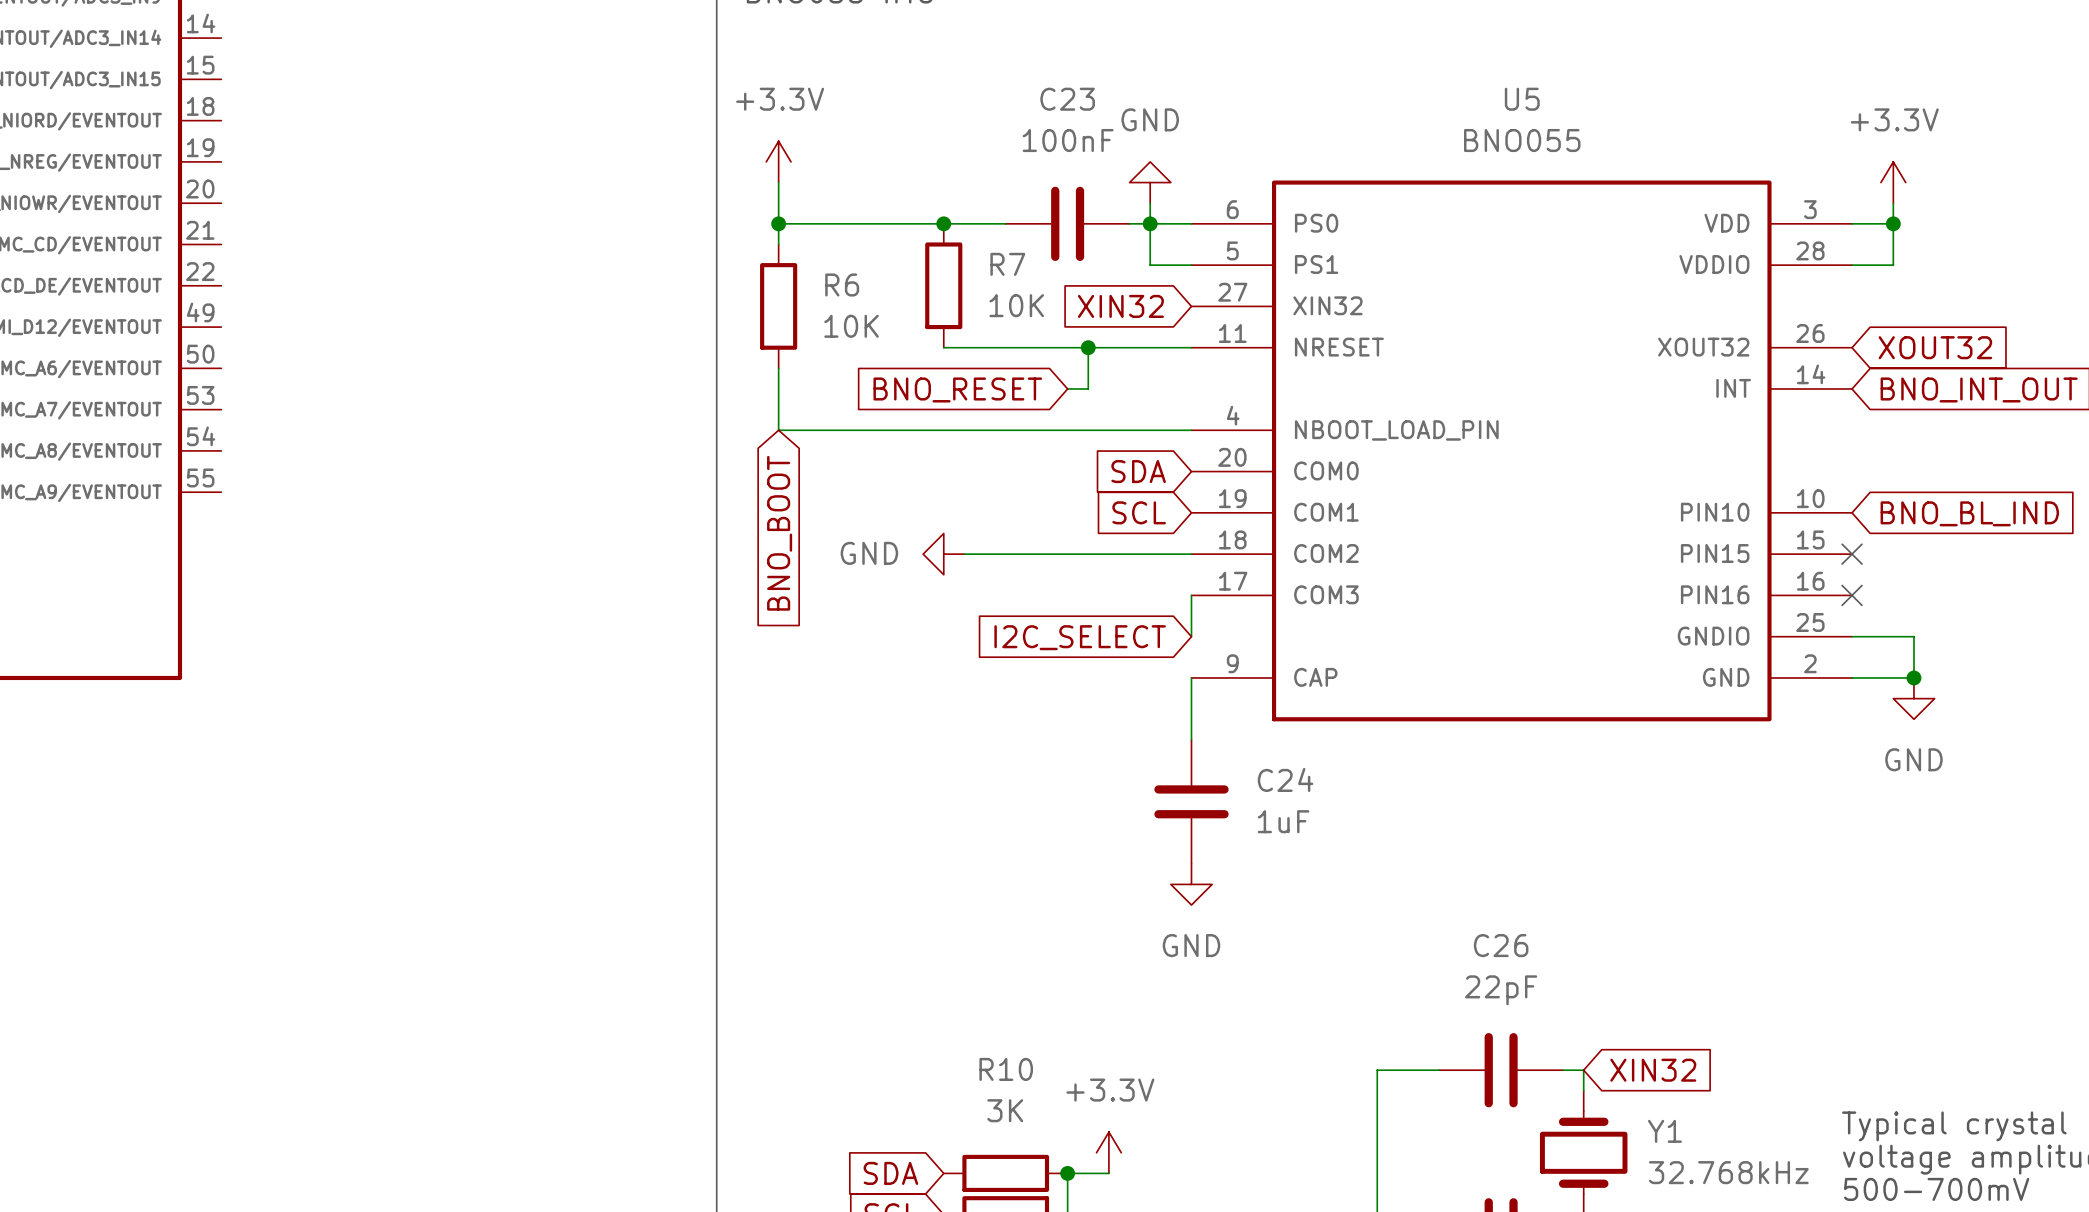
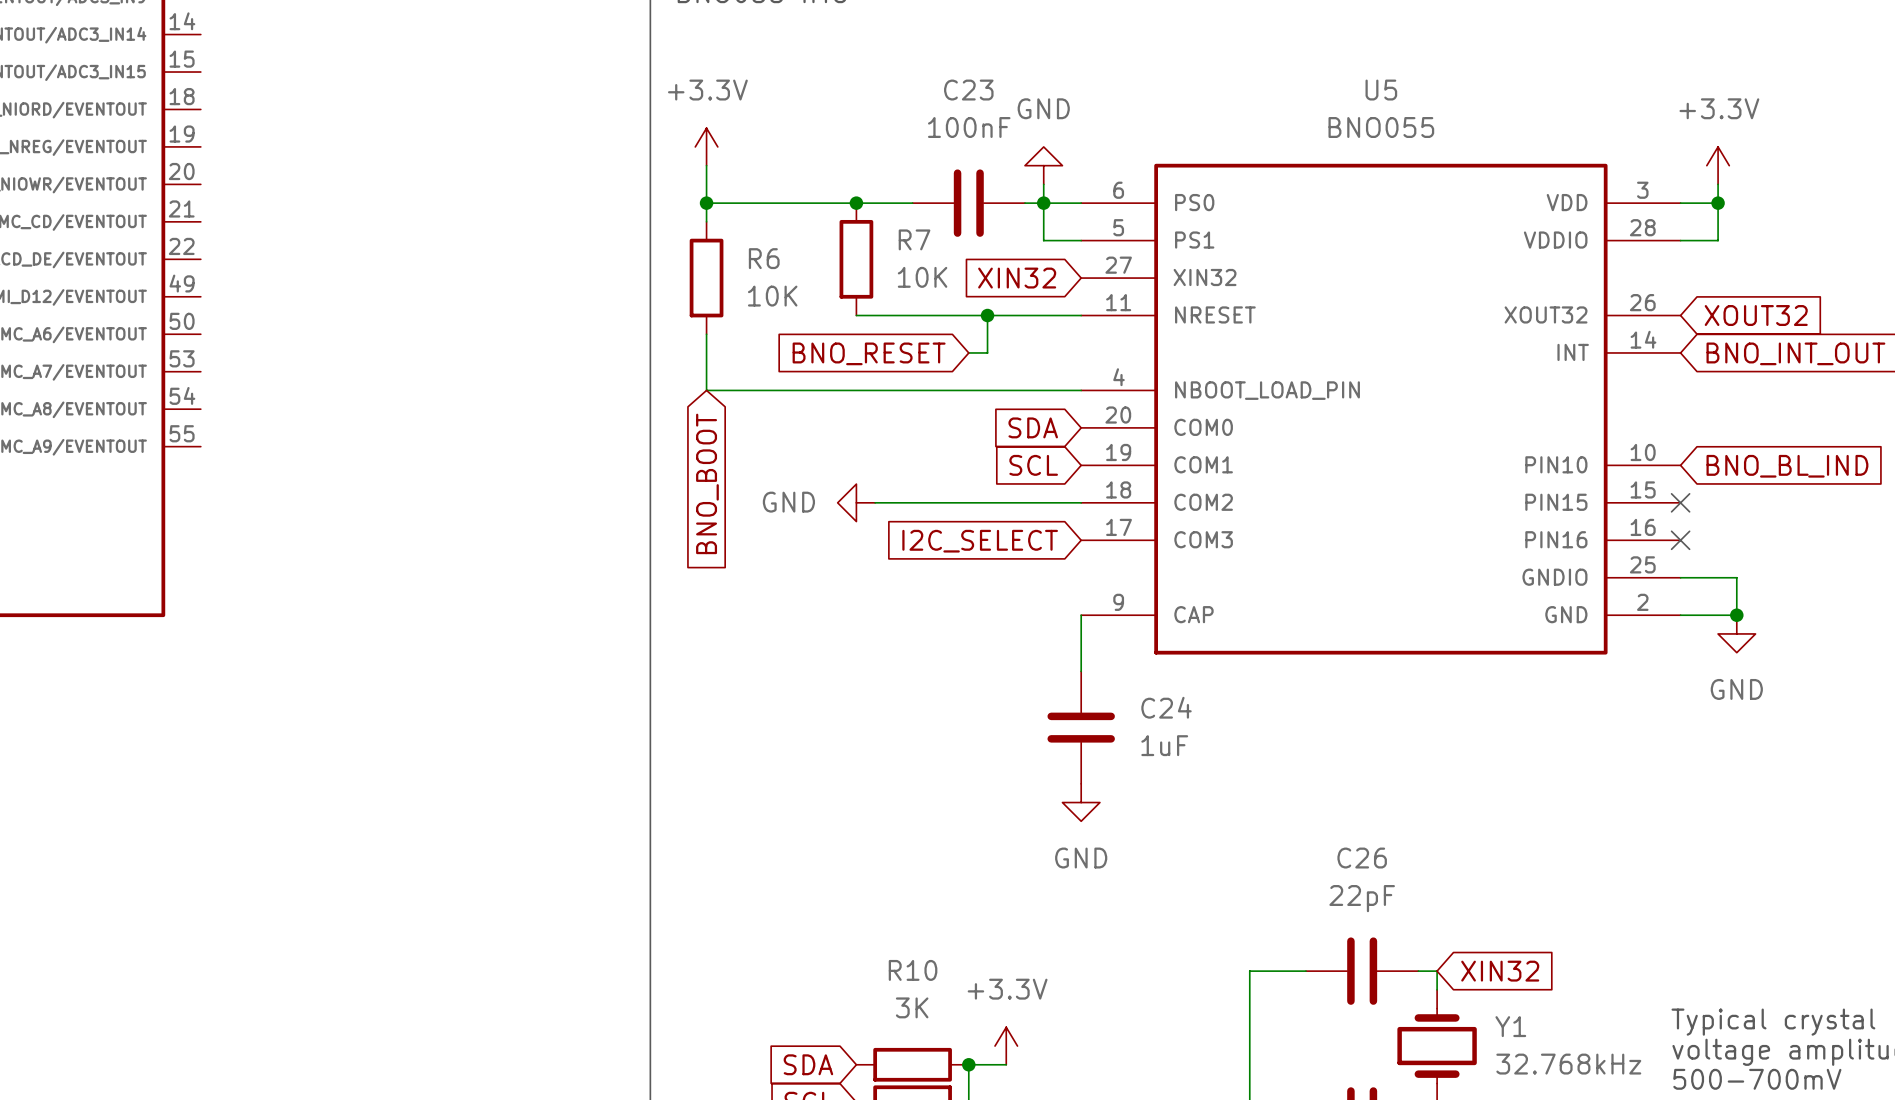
wire: (1191, 595) (1191, 636) -> none
global label position: I2C_SELECT (1080, 637) -> I2C_SELECT (980, 541)

